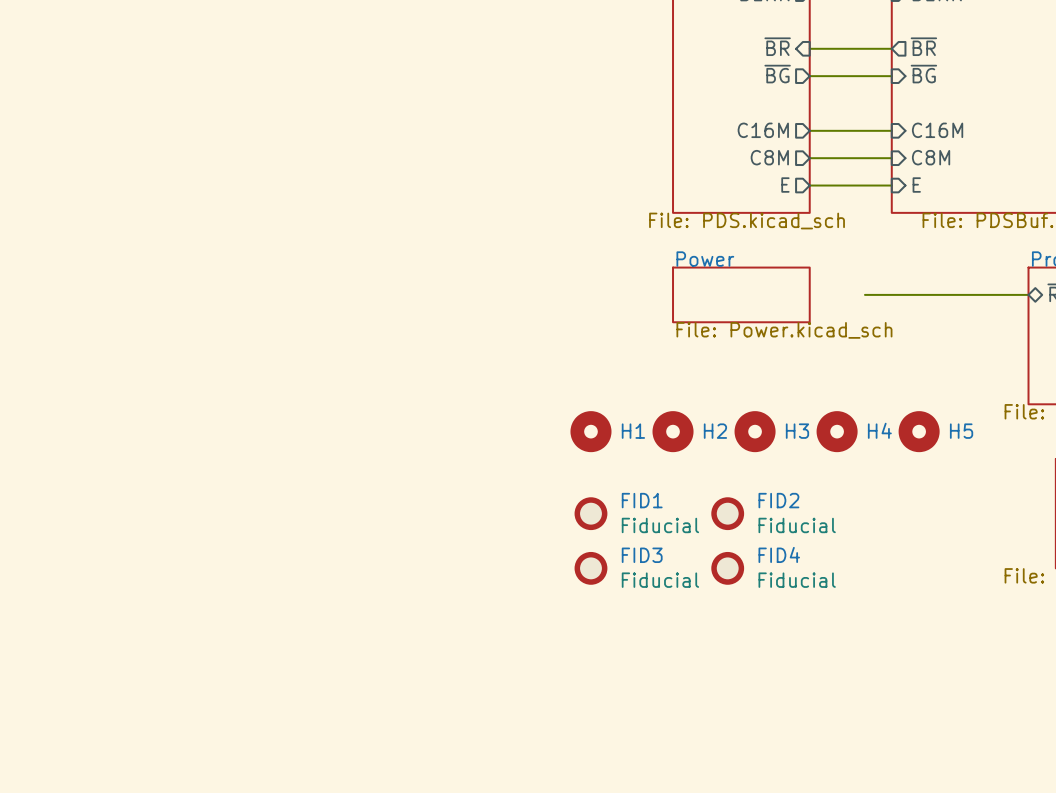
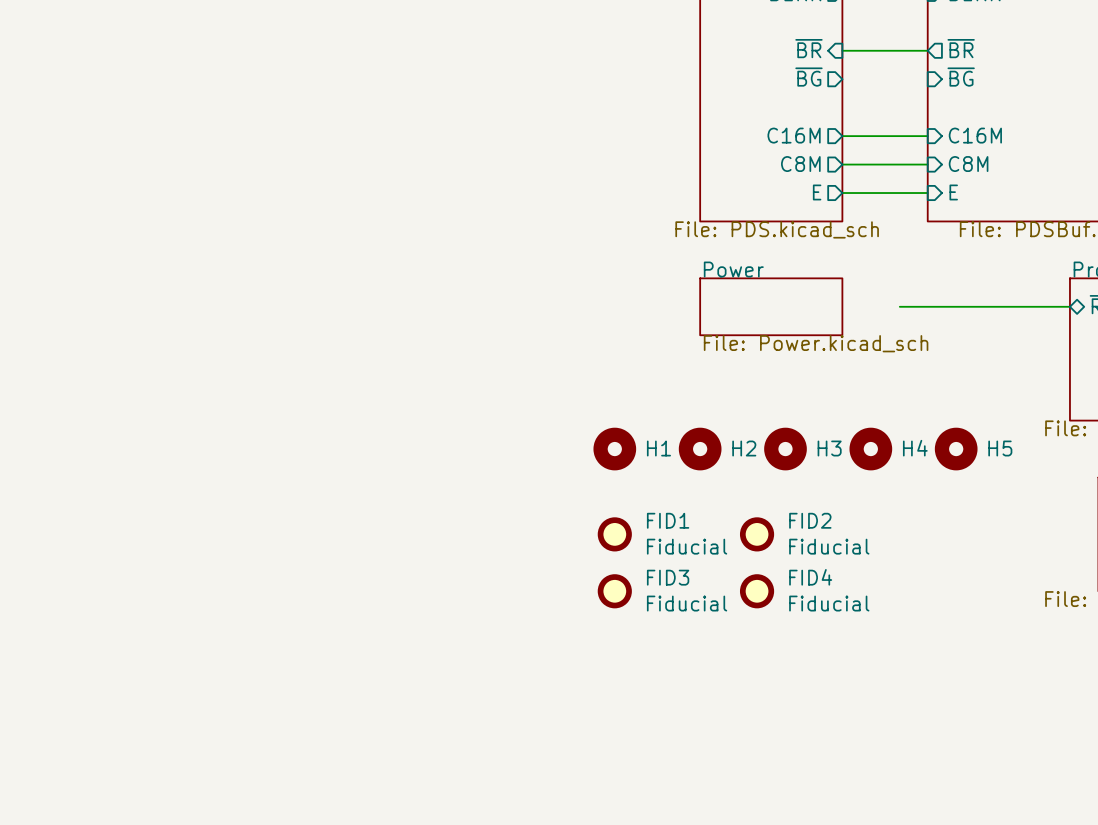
wire: (809, 76) (891, 76) -> none

